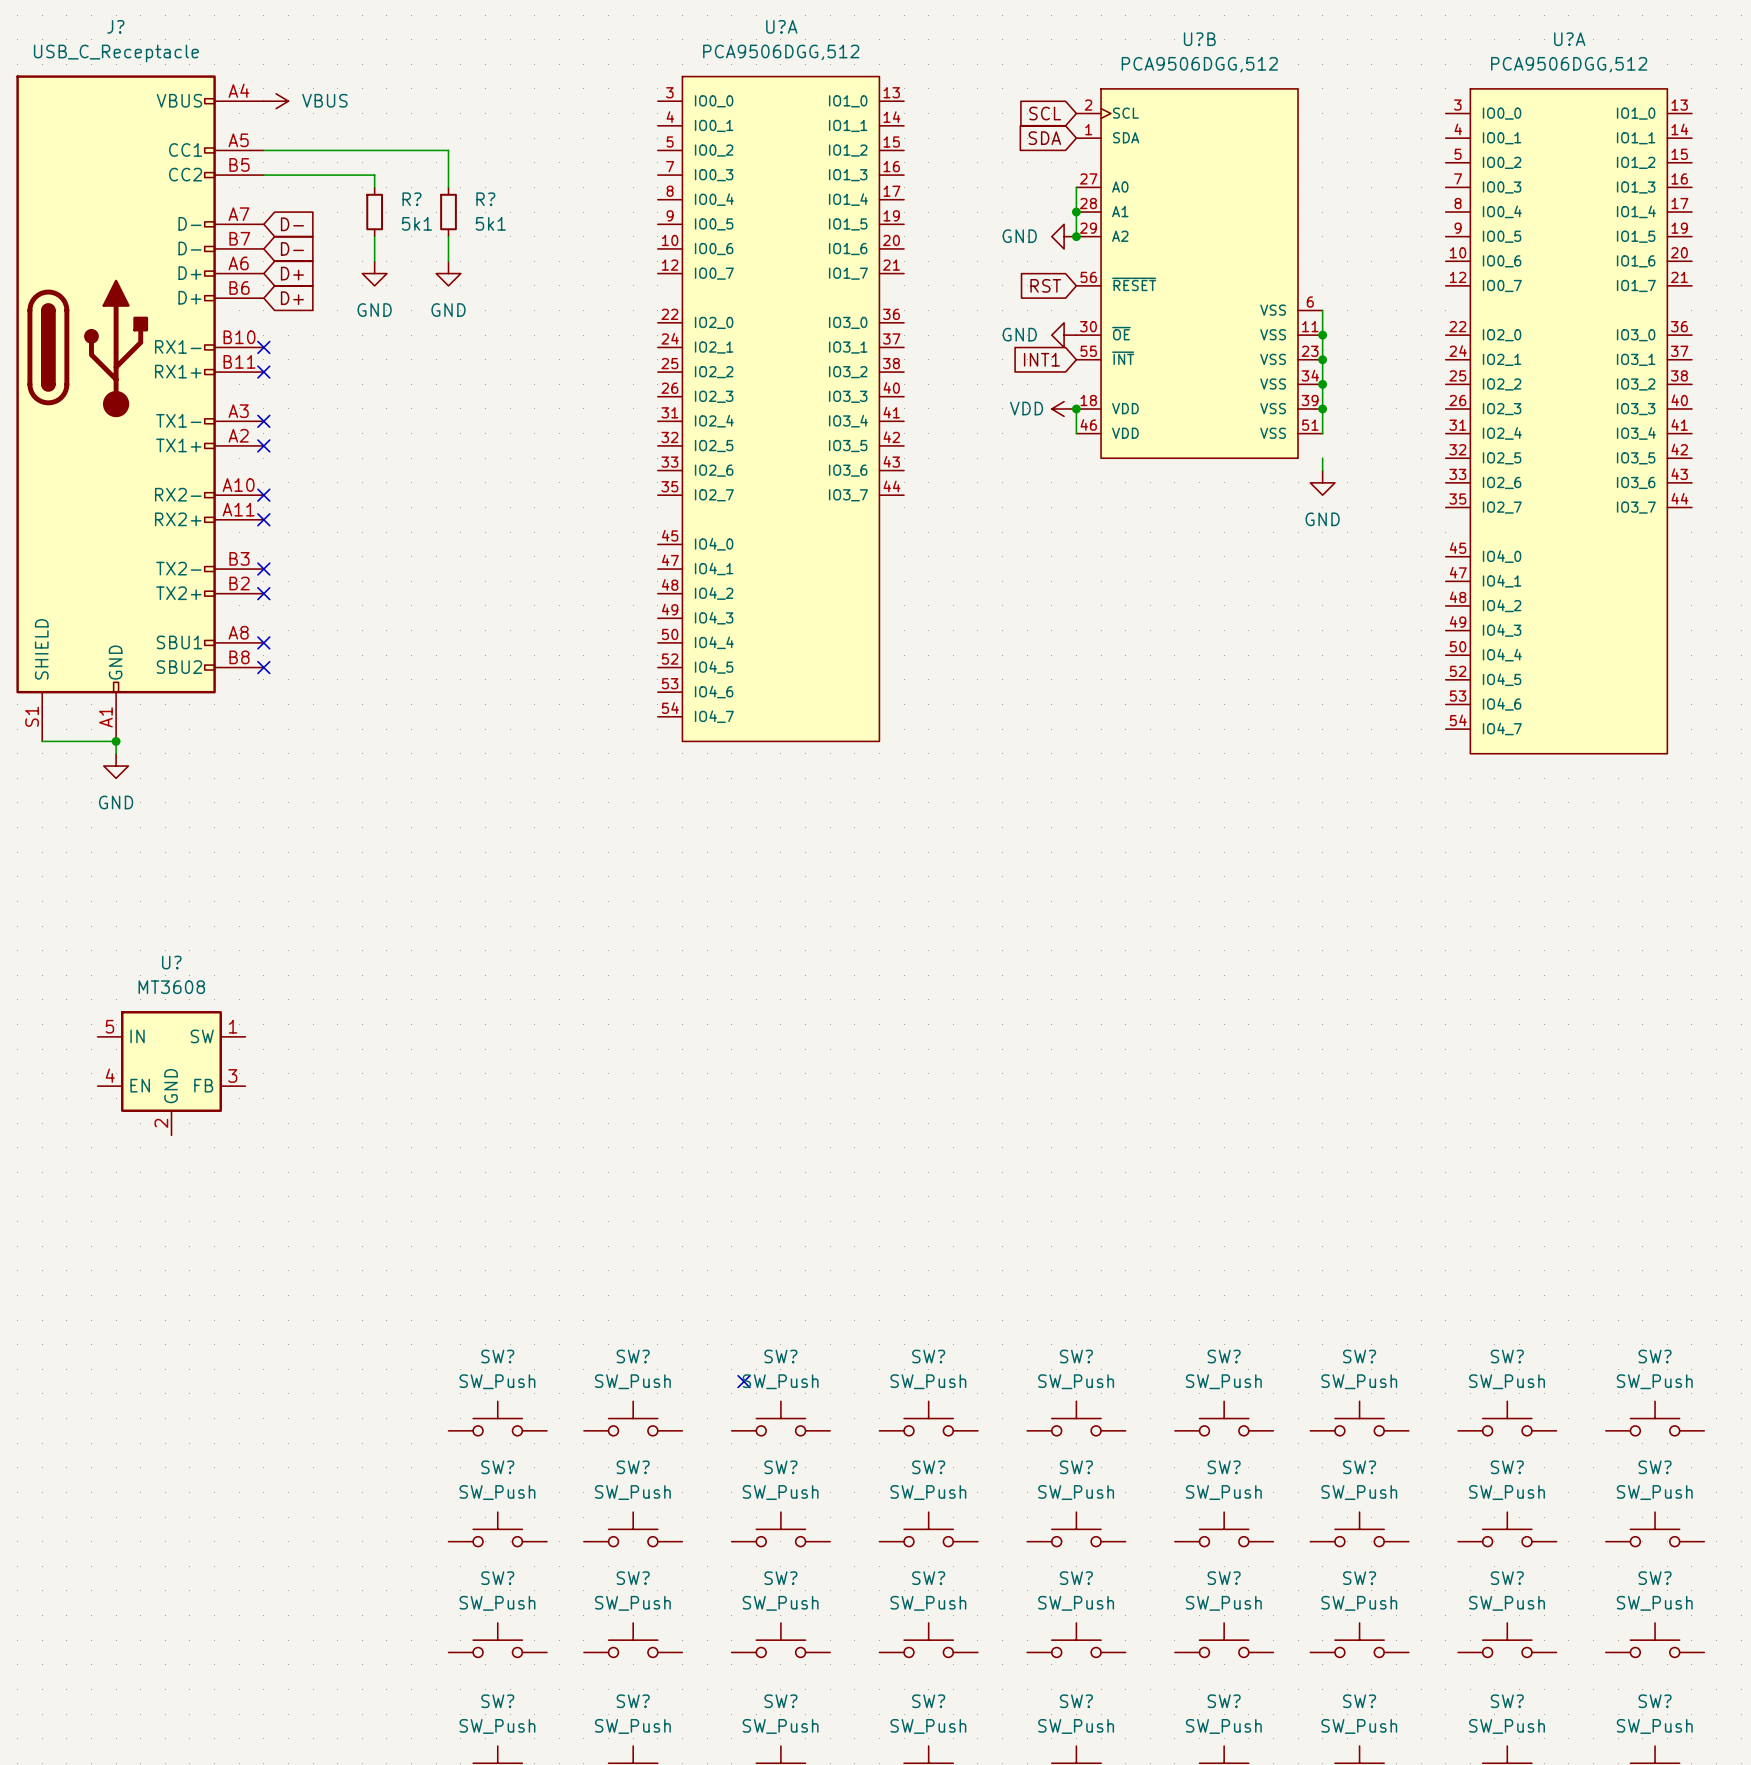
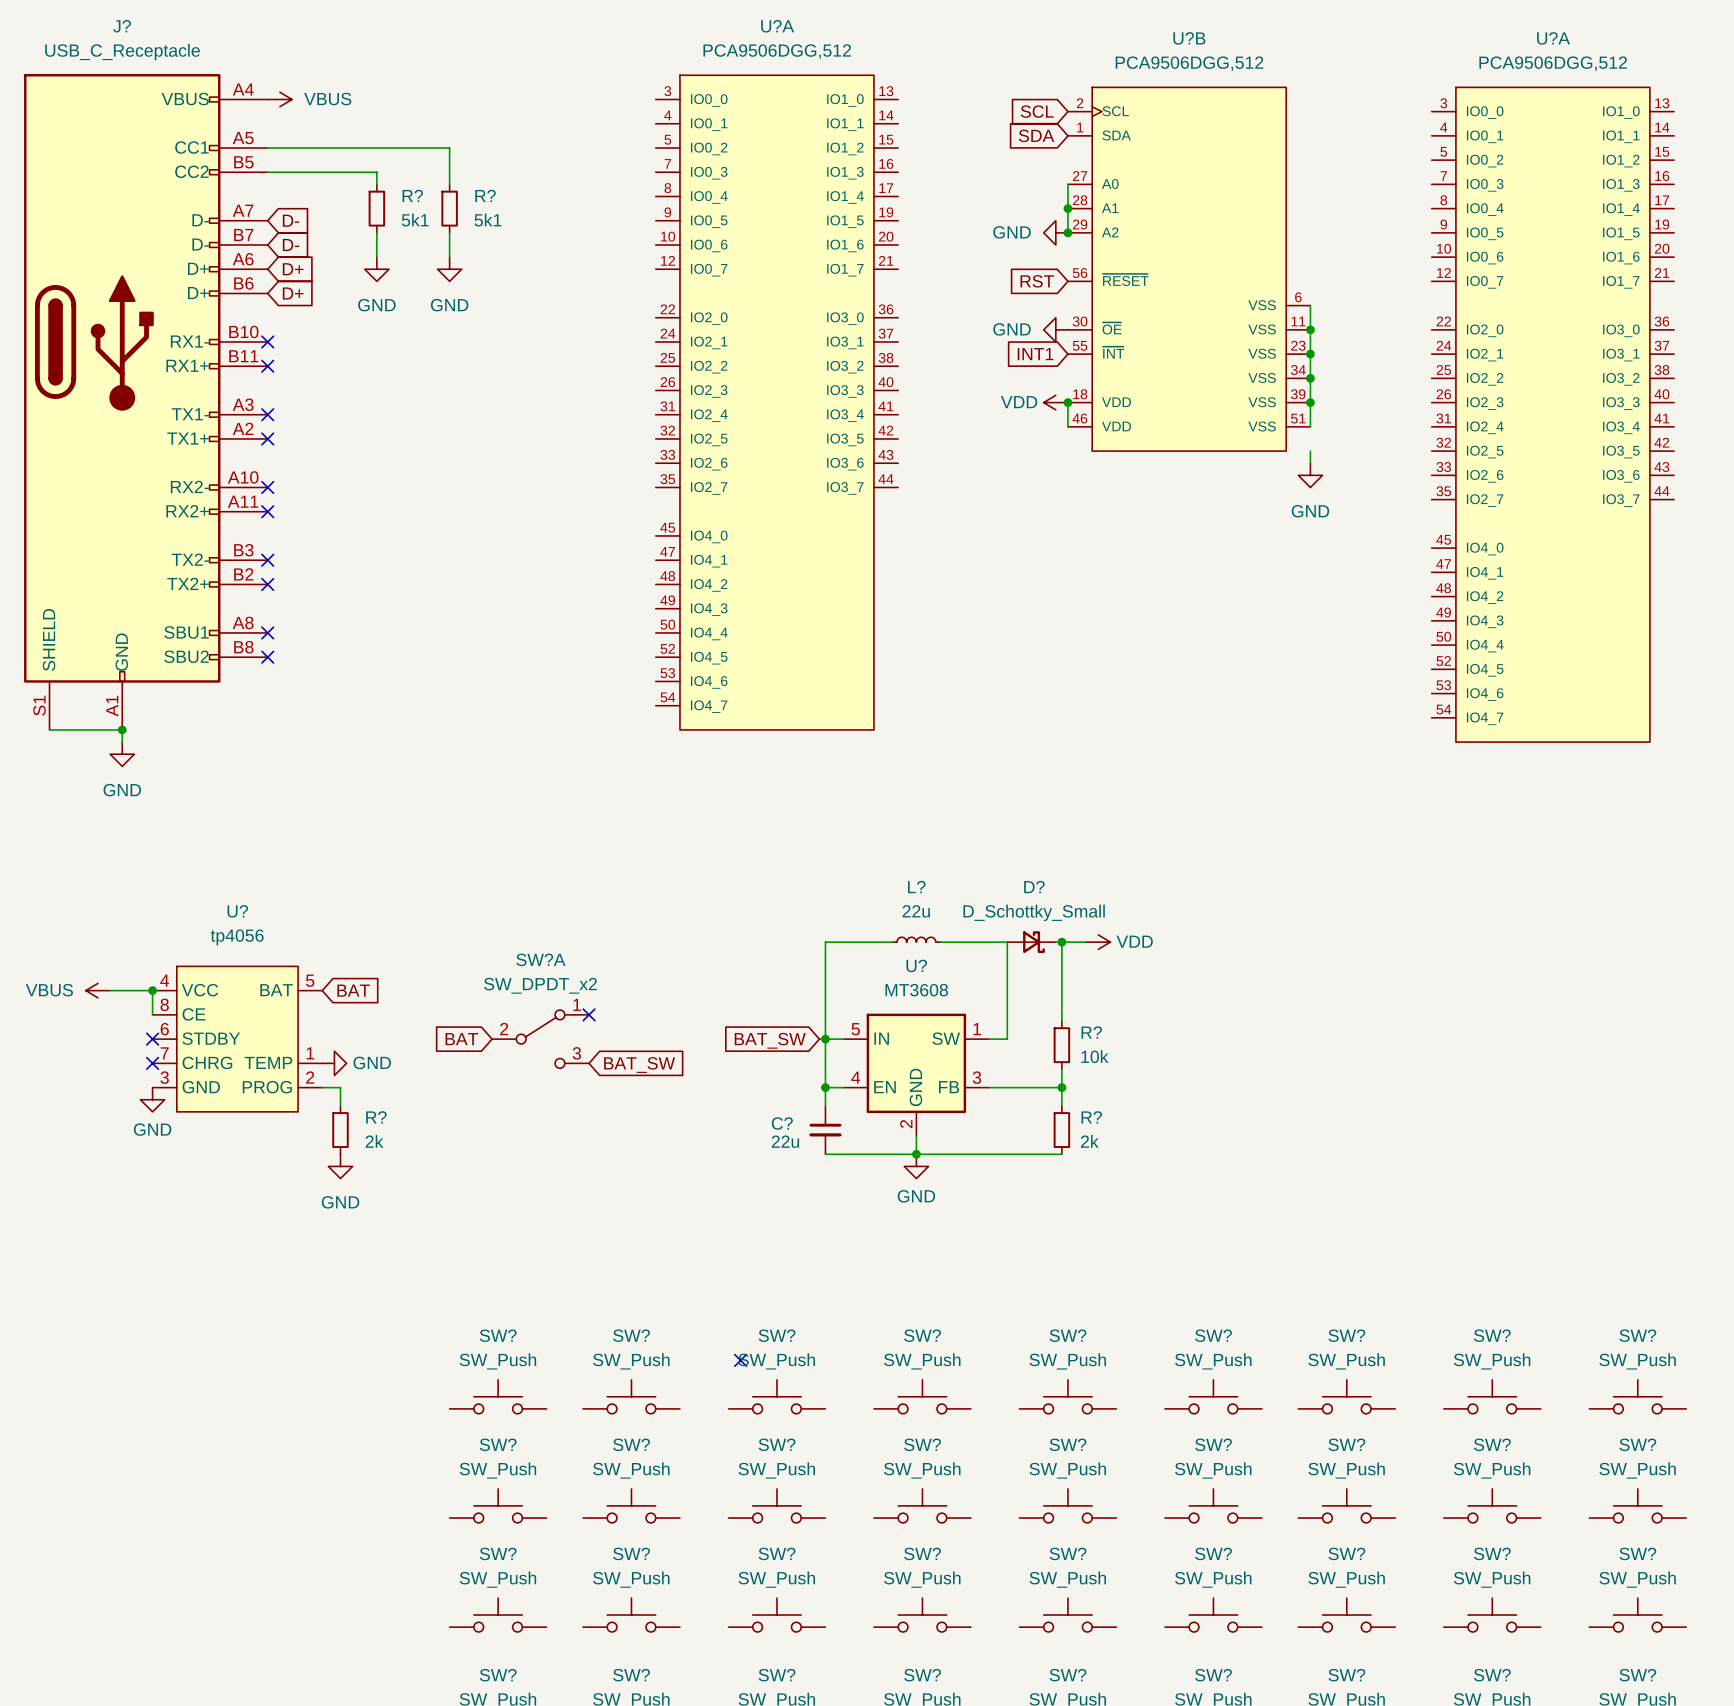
L?: none -> 22u (916, 939)
wire: none -> (892, 942) (825, 942) (825, 1105)
wire: none -> (940, 942) (1007, 942) (1007, 1039) (989, 1039)
D?: none -> D_Schottky_Small (1031, 942)
wire: none -> (1055, 942) (1086, 942)
wire: none -> (1061, 942) (1061, 1020)
junction: none -> (1061, 942)
power symbol: none -> VDD (1098, 942)
power symbol: none -> VBUS (98, 990)
wire: none -> (110, 990) (152, 990) (152, 1014)
junction: none -> (152, 990)
global label: none -> BAT (353, 990)
no-connect mark: none -> (589, 1014)
no-connect mark: none -> (152, 1039)
U?: none -> tp4056 (237, 1039)
global label: none -> BAT (461, 1039)
SW?A: none -> SW_DPDT_x2 (540, 1039)
global label: none -> BAT_SW (770, 1040)
wire: none -> (819, 1039) (843, 1039)
junction: none -> (825, 1039)
R?: none -> 10k (1061, 1045)
U?: MT3608 (171, 1073) -> none
no-connect mark: none -> (152, 1063)
power symbol: none -> GND (334, 1063)
global label: none -> BAT_SW (639, 1065)
wire: none -> (1061, 1069) (1061, 1105)
U?: none -> MT3608 (916, 1074)
wire: none -> (322, 1087) (340, 1087) (340, 1105)
wire: none -> (825, 1087) (843, 1087)
junction: none -> (825, 1087)
wire: none -> (989, 1087) (1061, 1087)
junction: none -> (1061, 1087)
power symbol: none -> GND (152, 1099)
R?: none -> 2k (340, 1130)
C?: none -> 22u (825, 1130)
R?: none -> 2k (1061, 1130)
wire: none -> (916, 1136) (916, 1154)
wire: none -> (825, 1154) (1061, 1154)
junction: none -> (916, 1154)
power symbol: none -> GND (340, 1166)
power symbol: none -> GND (916, 1166)

